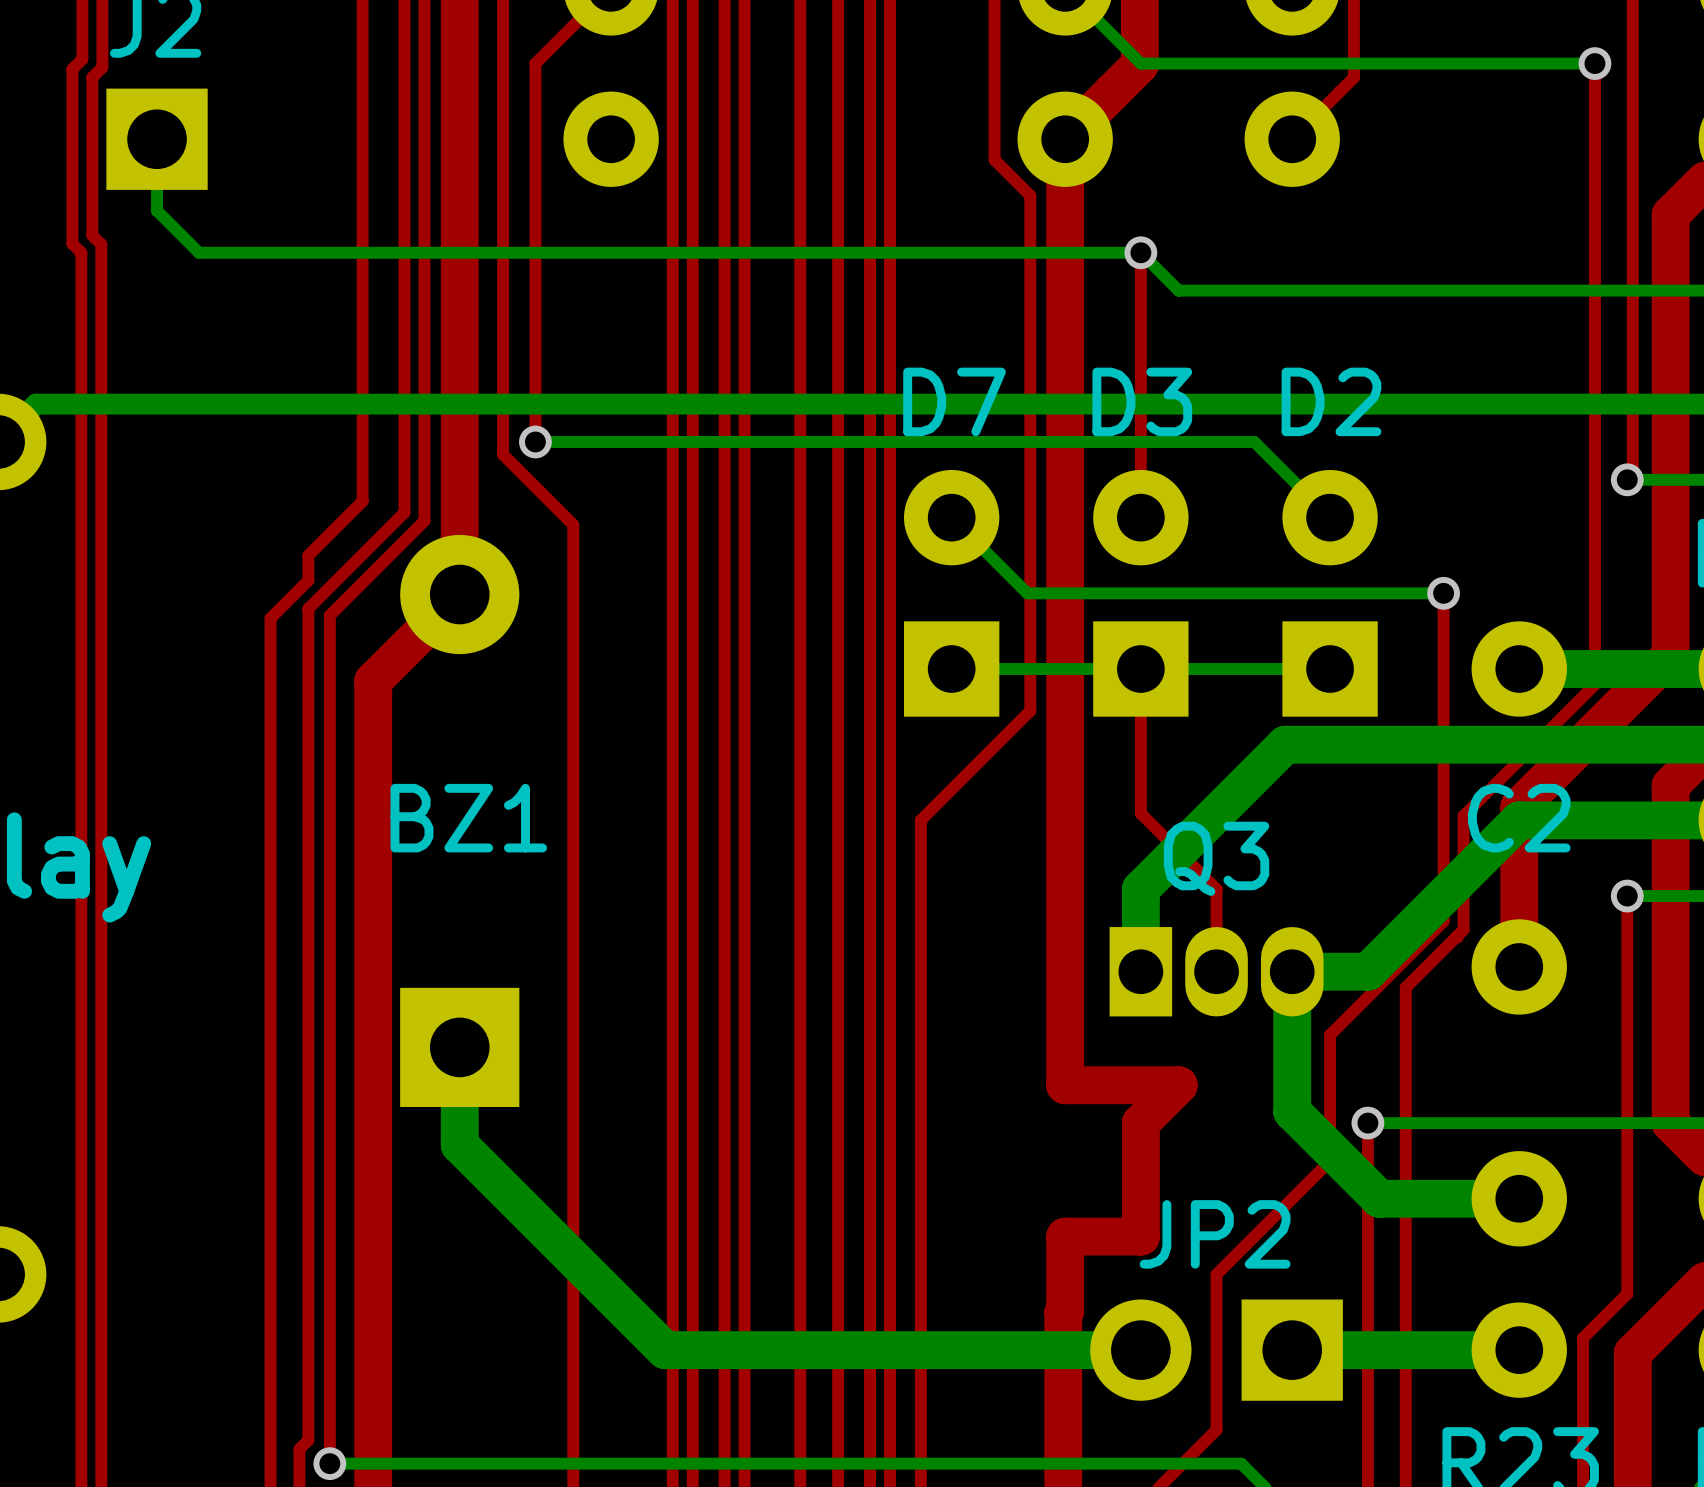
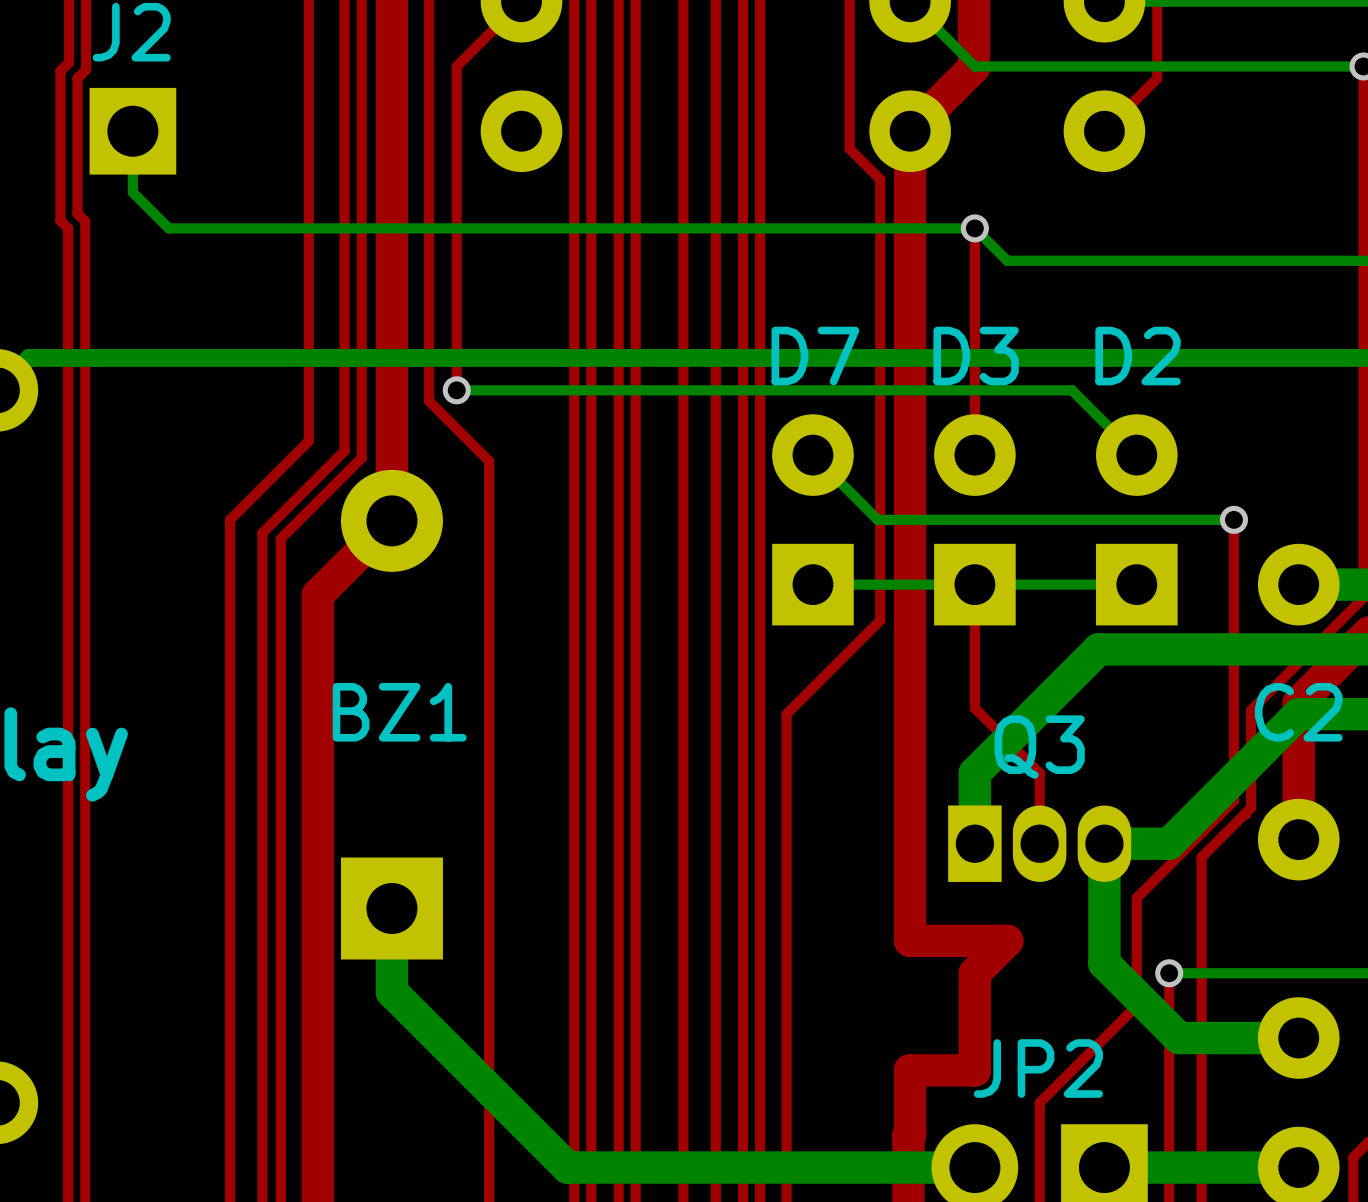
top track: (308, 555) (308, 580) (270, 618) -> (262, 487) (230, 519) (230, 541)

